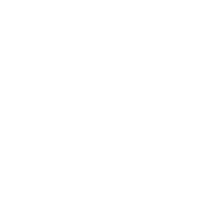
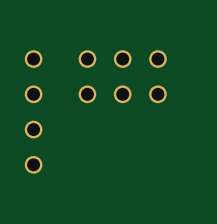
part: none -> (33, 59)
part: none -> (87, 59)
part: none -> (122, 59)
part: none -> (157, 59)
part: none -> (33, 94)
part: none -> (87, 94)
part: none -> (122, 94)
part: none -> (157, 94)
part: none -> (33, 129)
part: none -> (33, 164)

